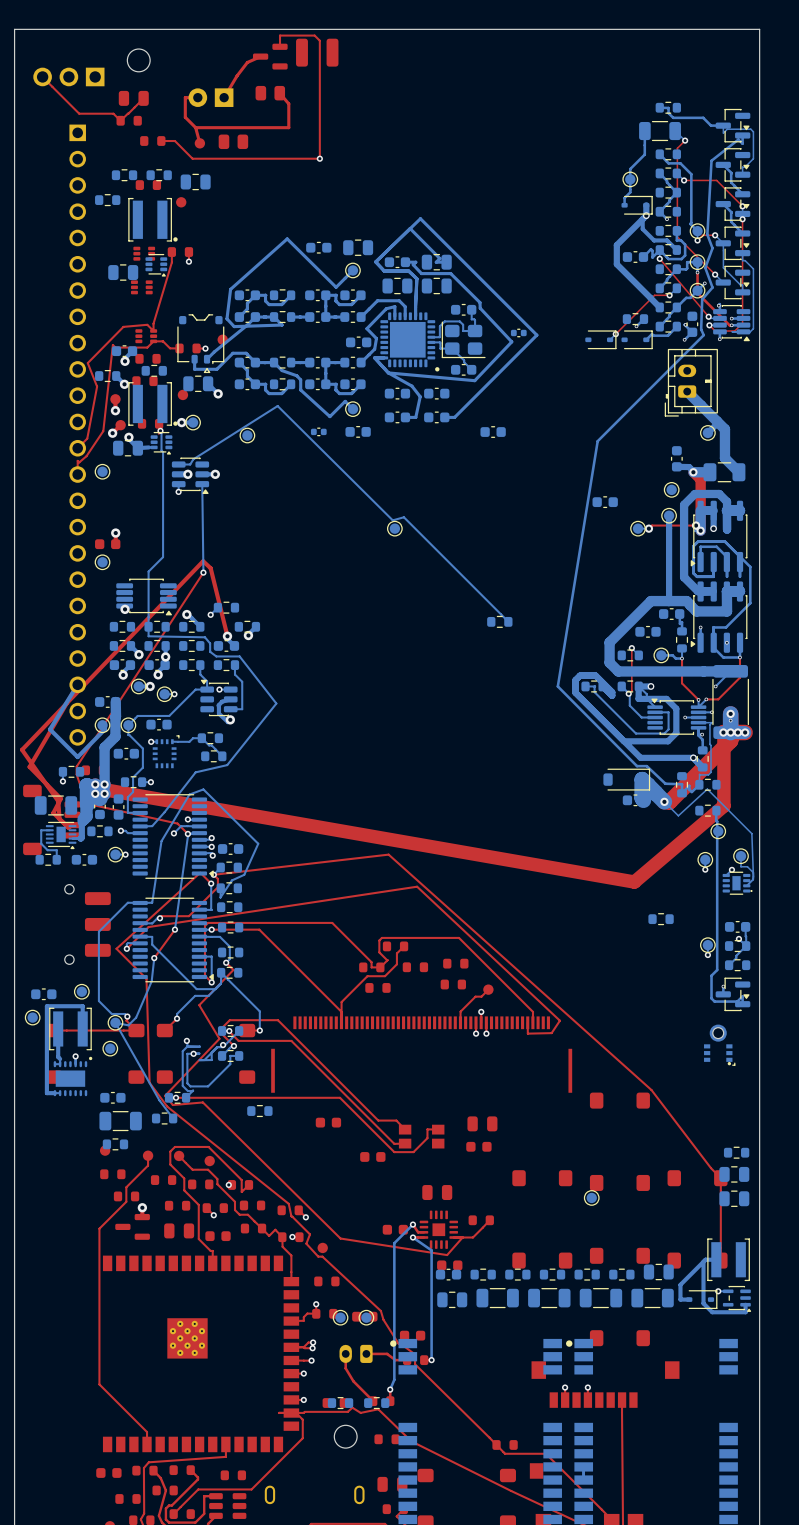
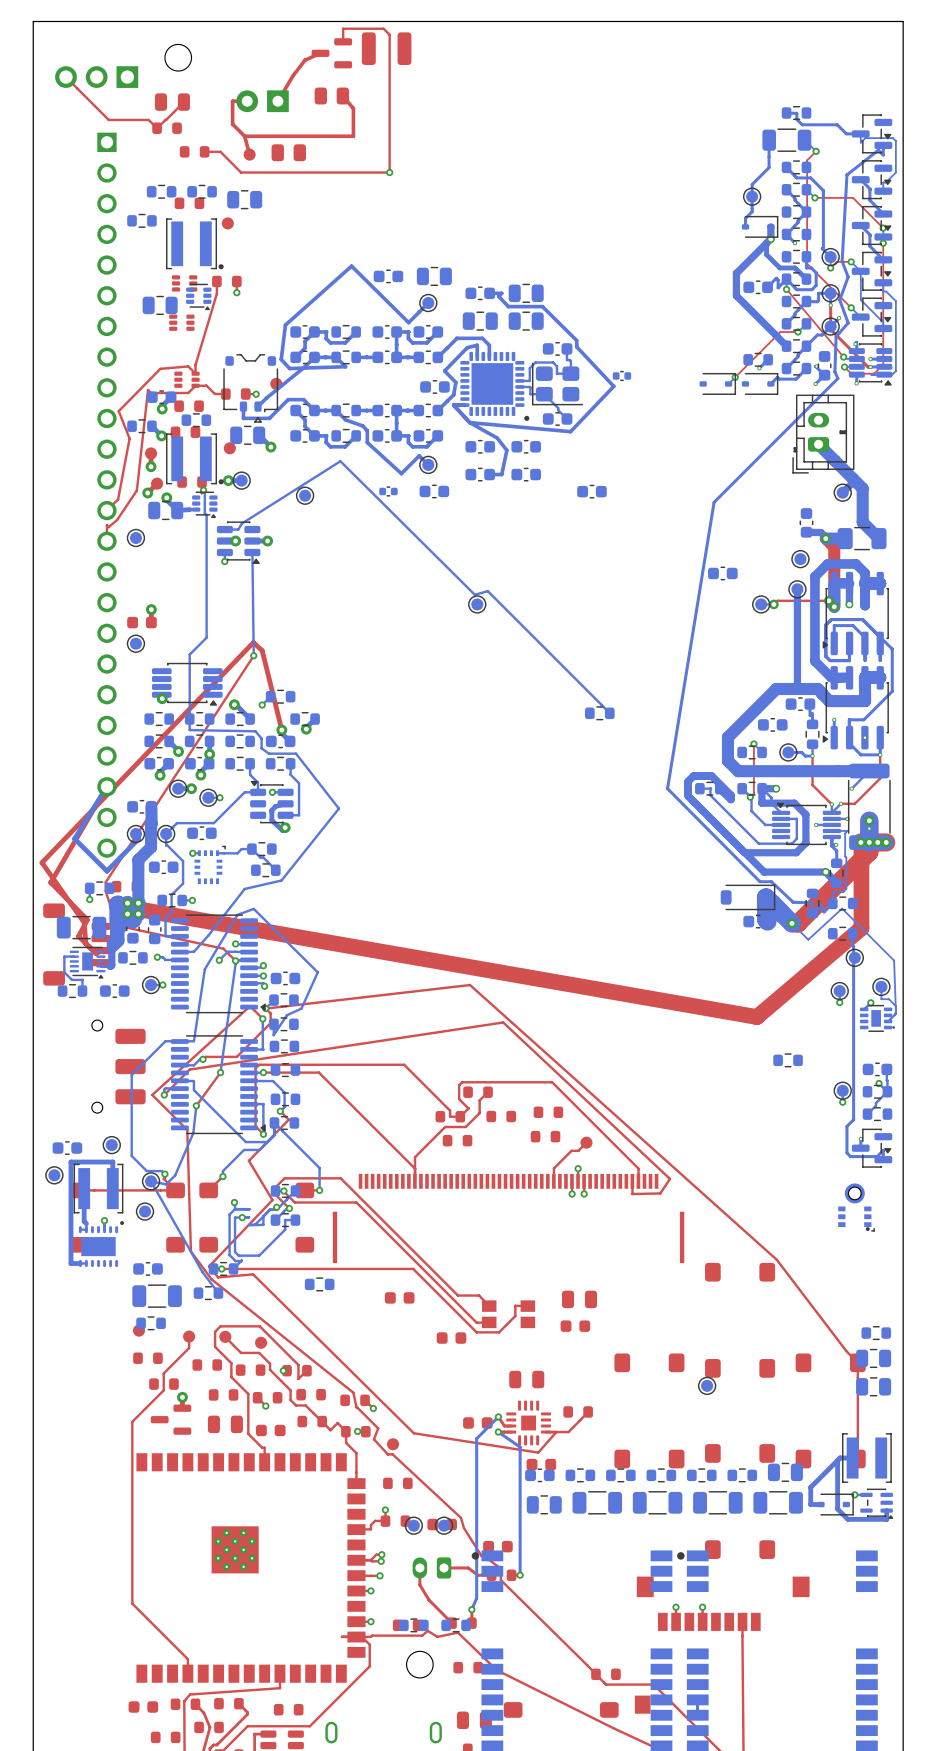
bottom track: (375, 261) (384, 270) (408, 270) (416, 278) (415, 316) -> none
bottom track: (375, 261) (420, 218) (536, 335) (454, 417) (444, 417) -> none
bottom track: (375, 261) (410, 228) (439, 258) (436, 262) (446, 262) -> none

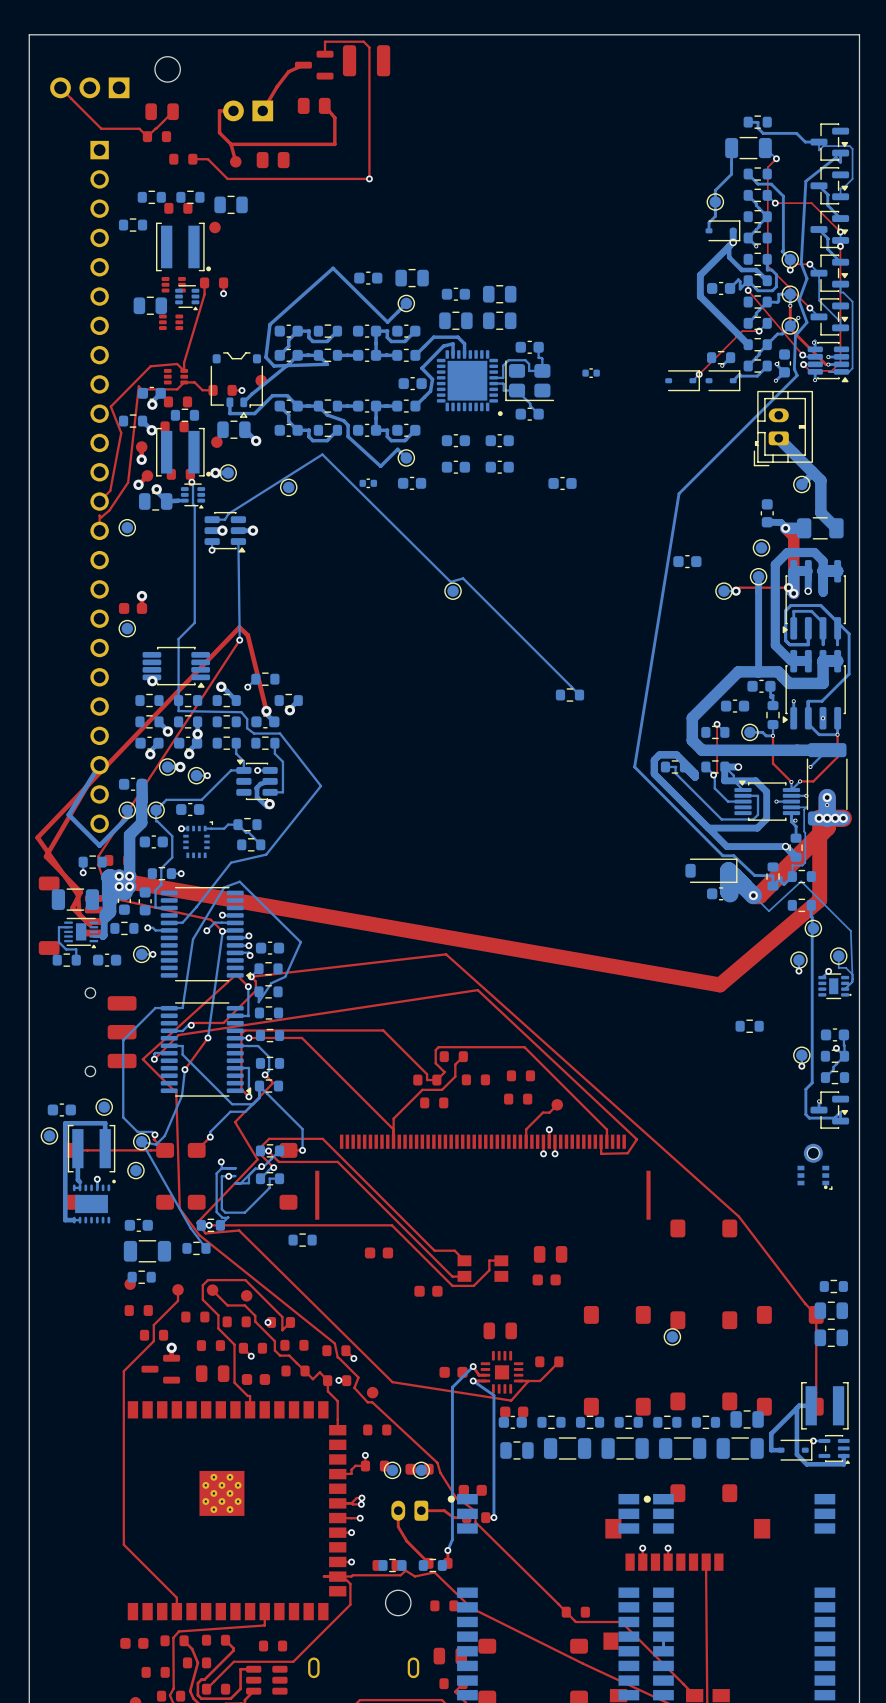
bottom track: (489, 293) (501, 293) (498, 296) (508, 306) (542, 306) (576, 340) (576, 347) (613, 386) (570, 431) (469, 422) -> none
bottom track: (464, 405) (453, 405) (469, 422) -> none
bottom track: (469, 422) (497, 438) (506, 450) (501, 474) (489, 474) -> none

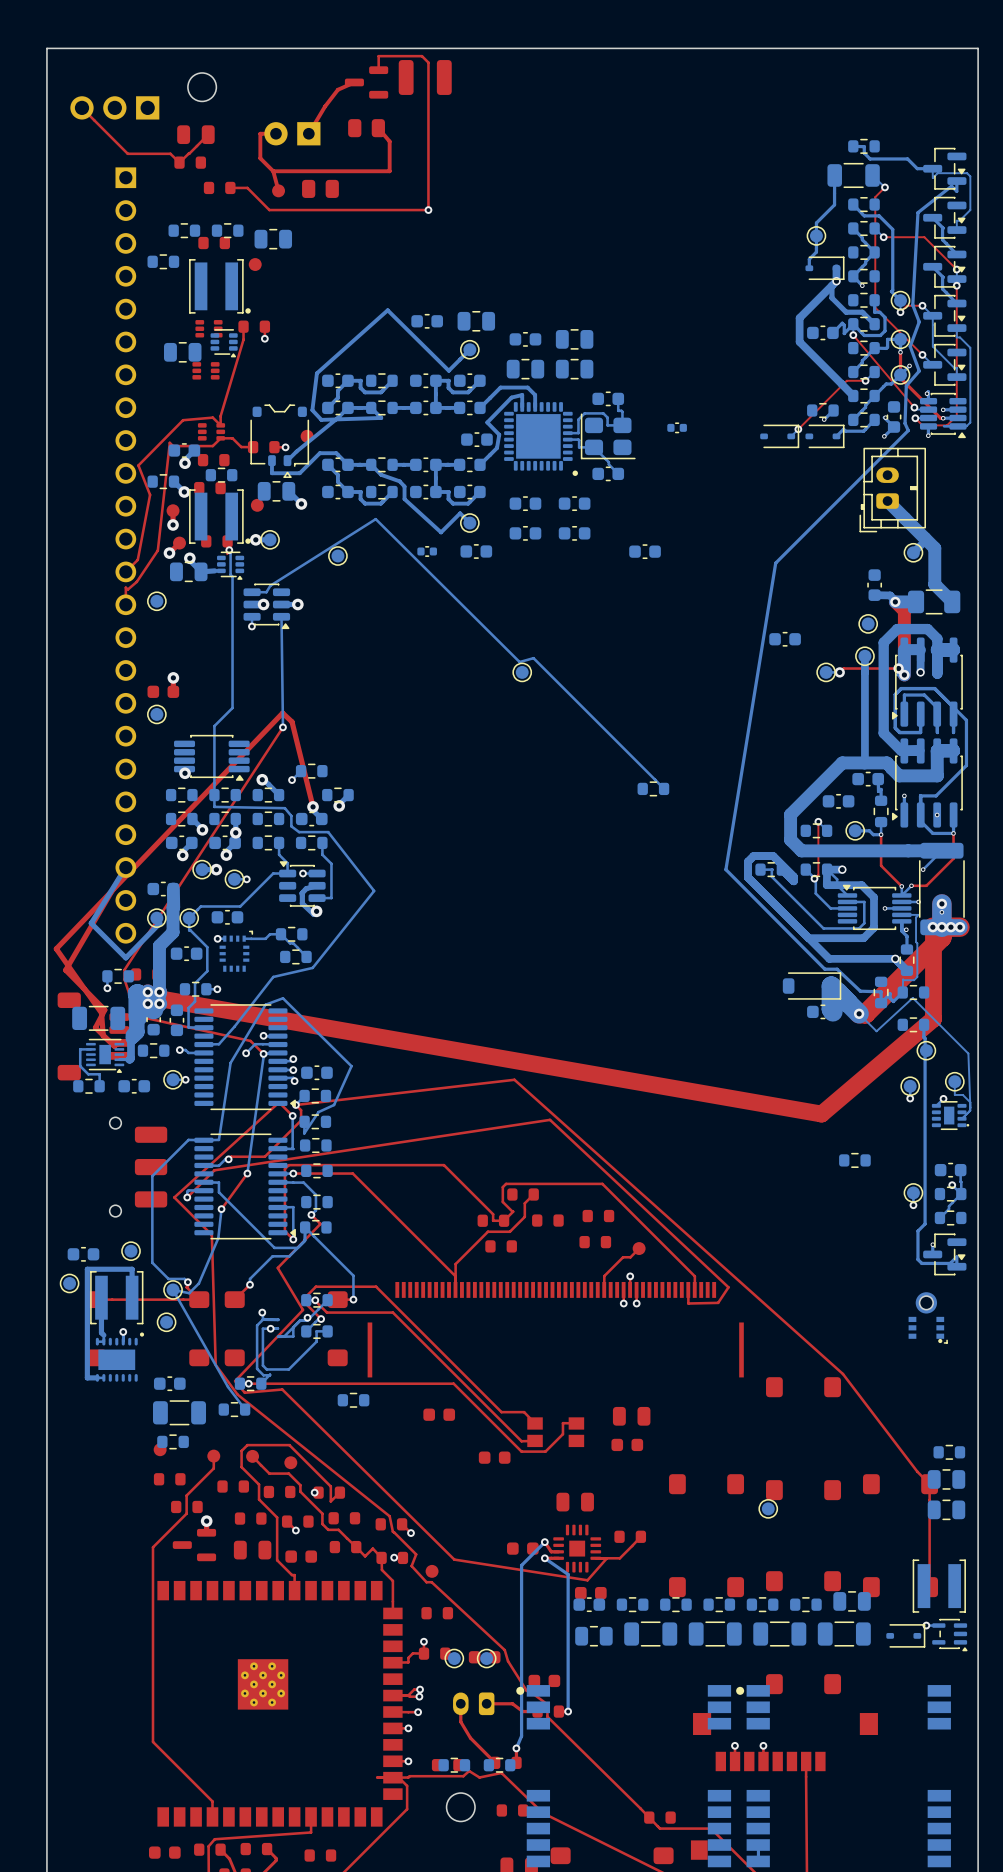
bottom track: (811, 1405) (799, 1405) (771, 1433) (771, 1450) (781, 1450) -> none
bottom track: (796, 1408) (796, 1454) (806, 1464) (843, 1464) (843, 1455) -> none

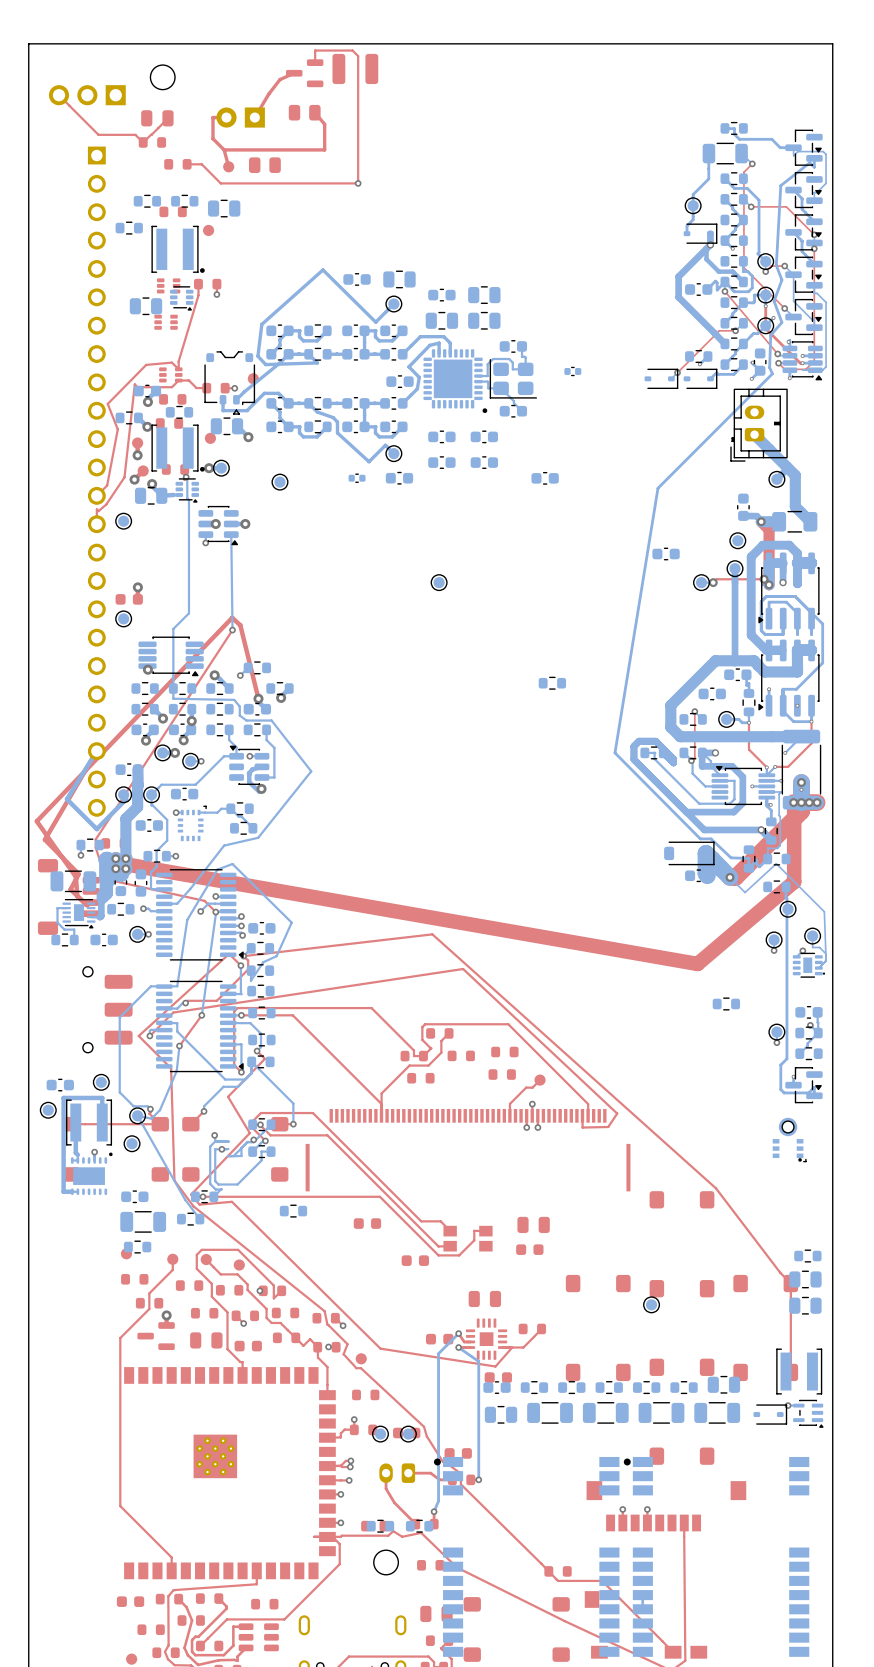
bottom track: (252, 592) (266, 592) (270, 585) (375, 519) (519, 662) (533, 658) (664, 788) -> none

